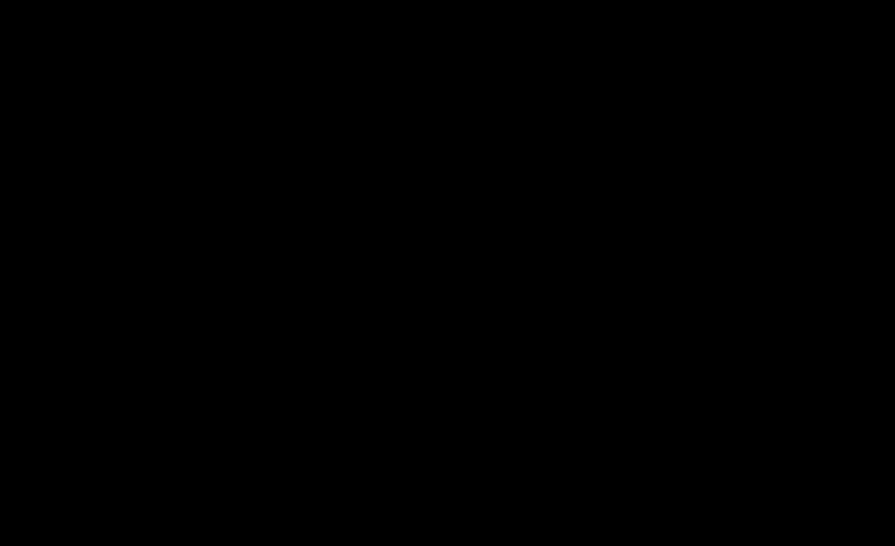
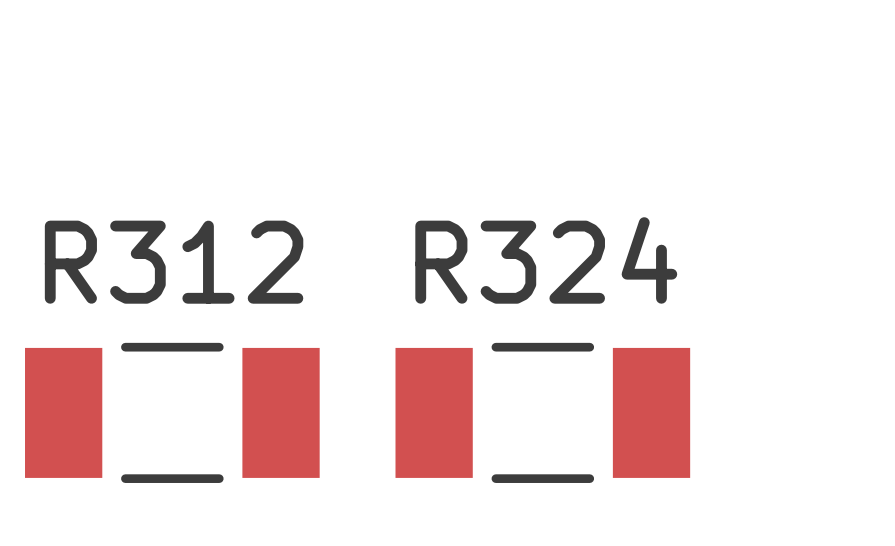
R312: none -> (172, 412)
R324: none -> (542, 412)

